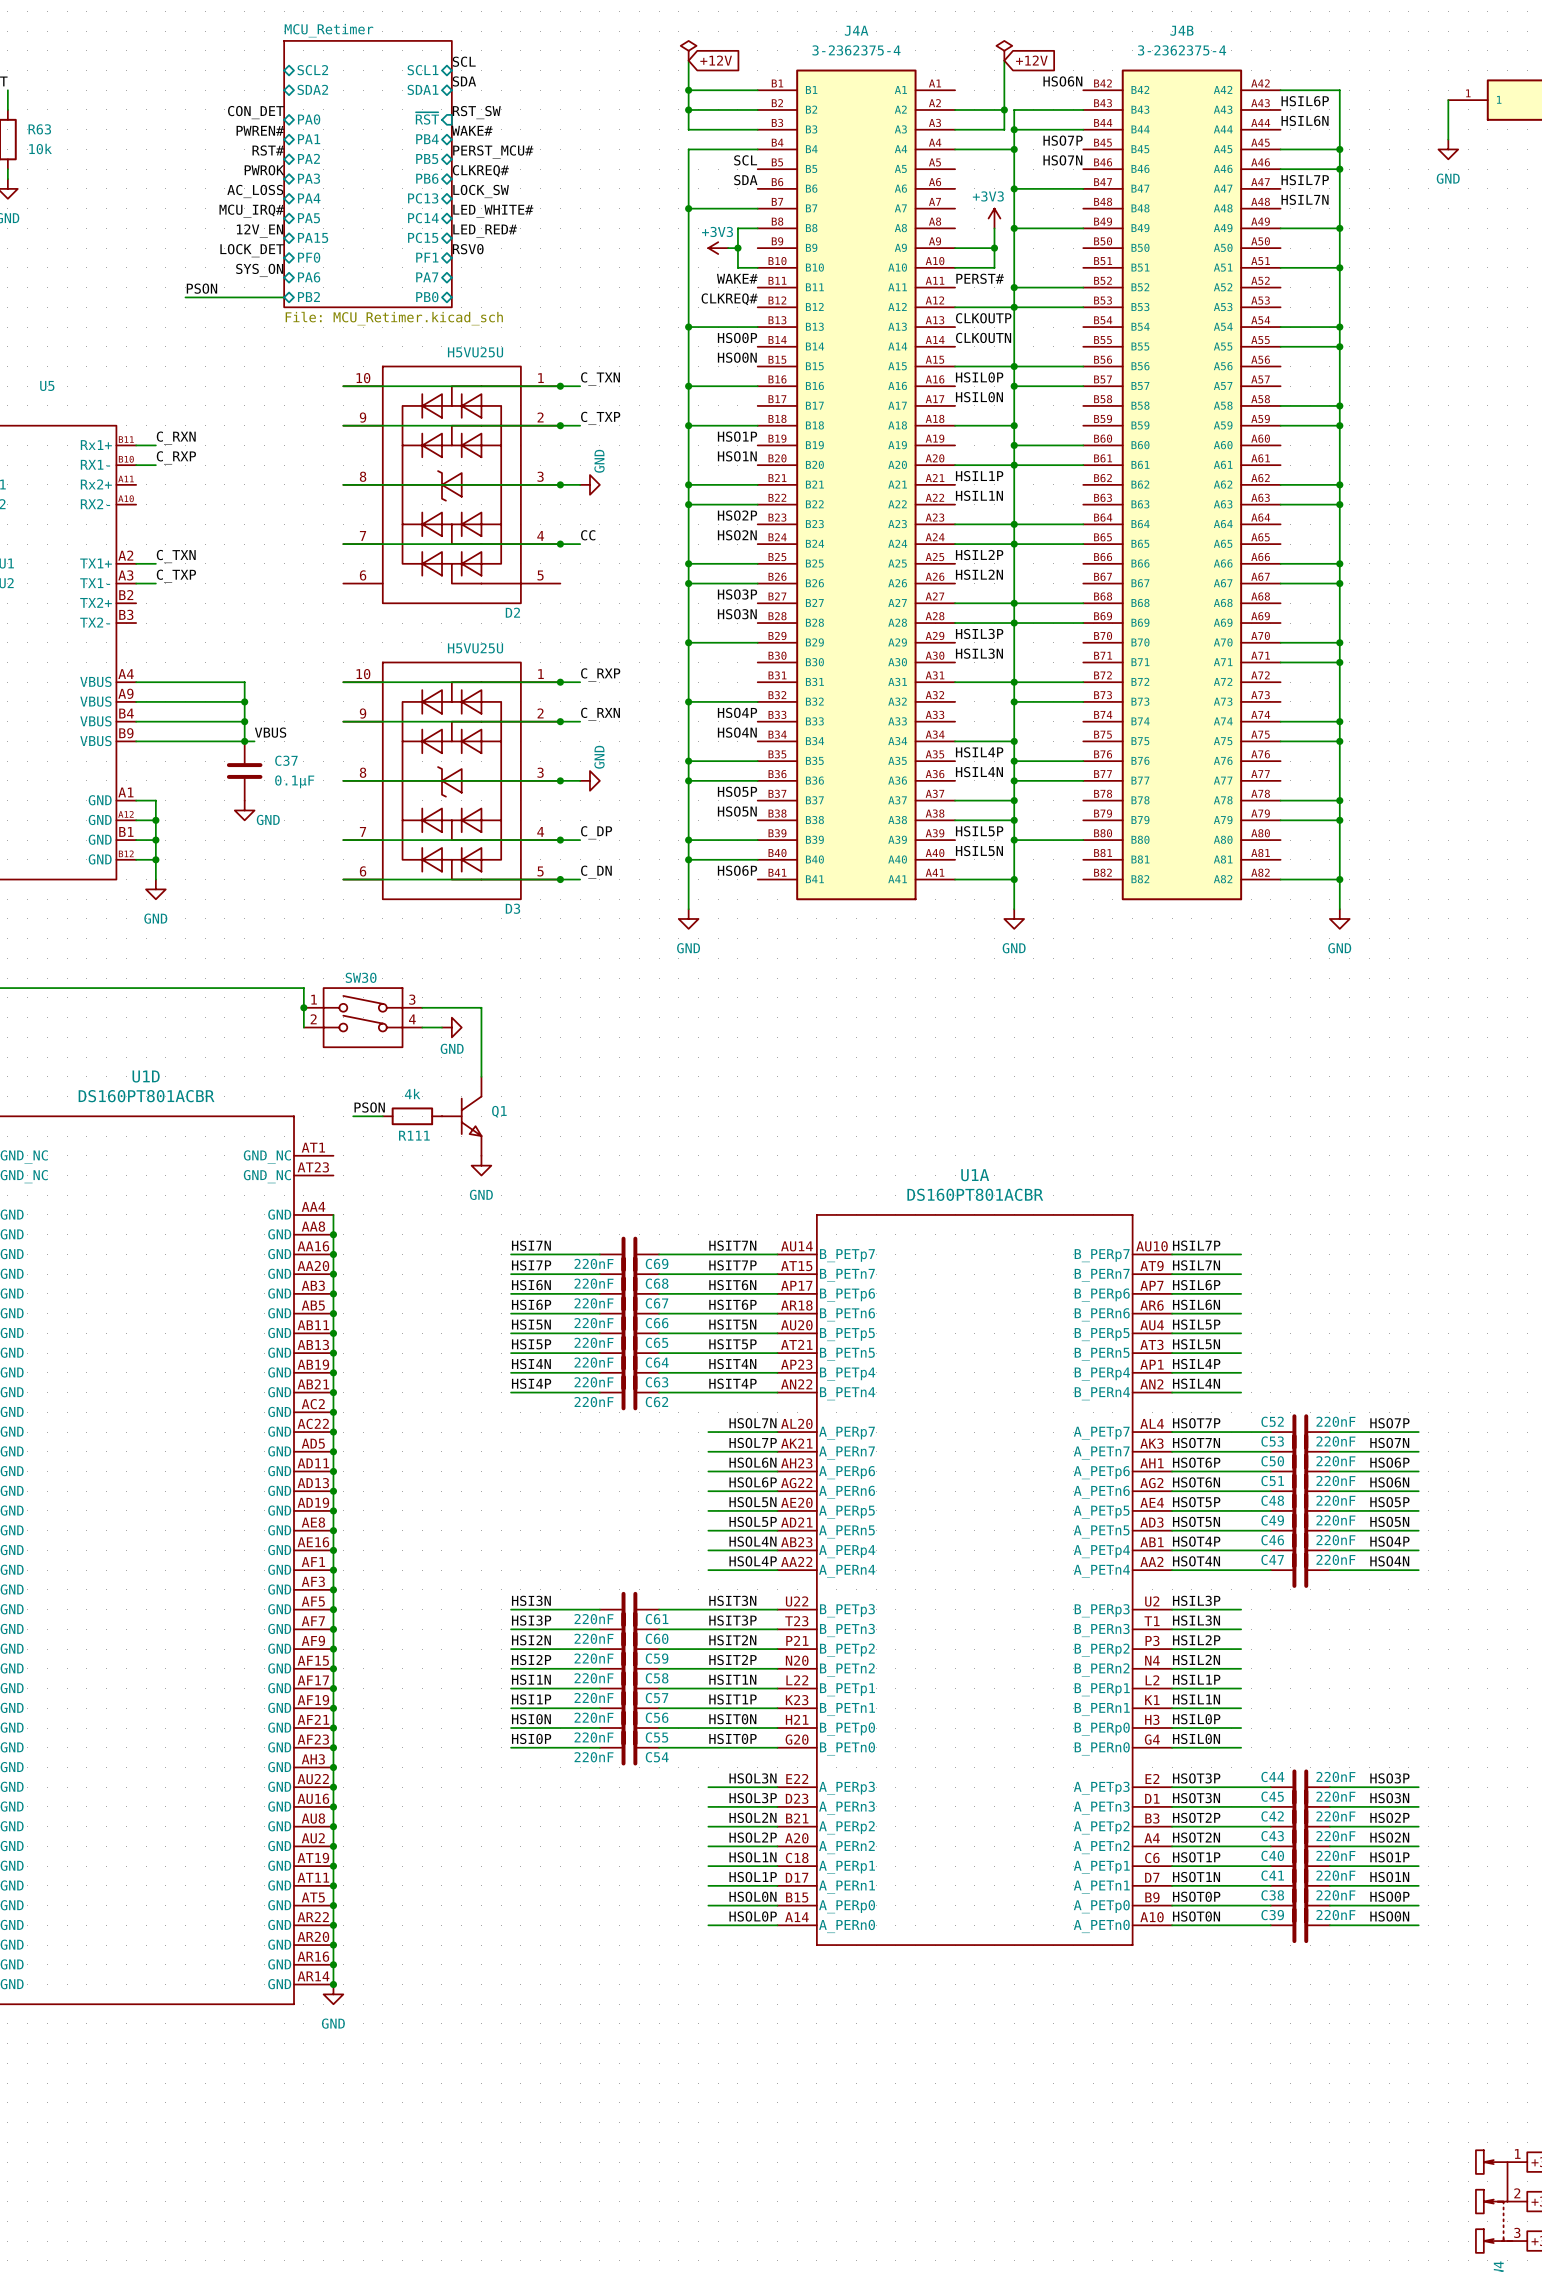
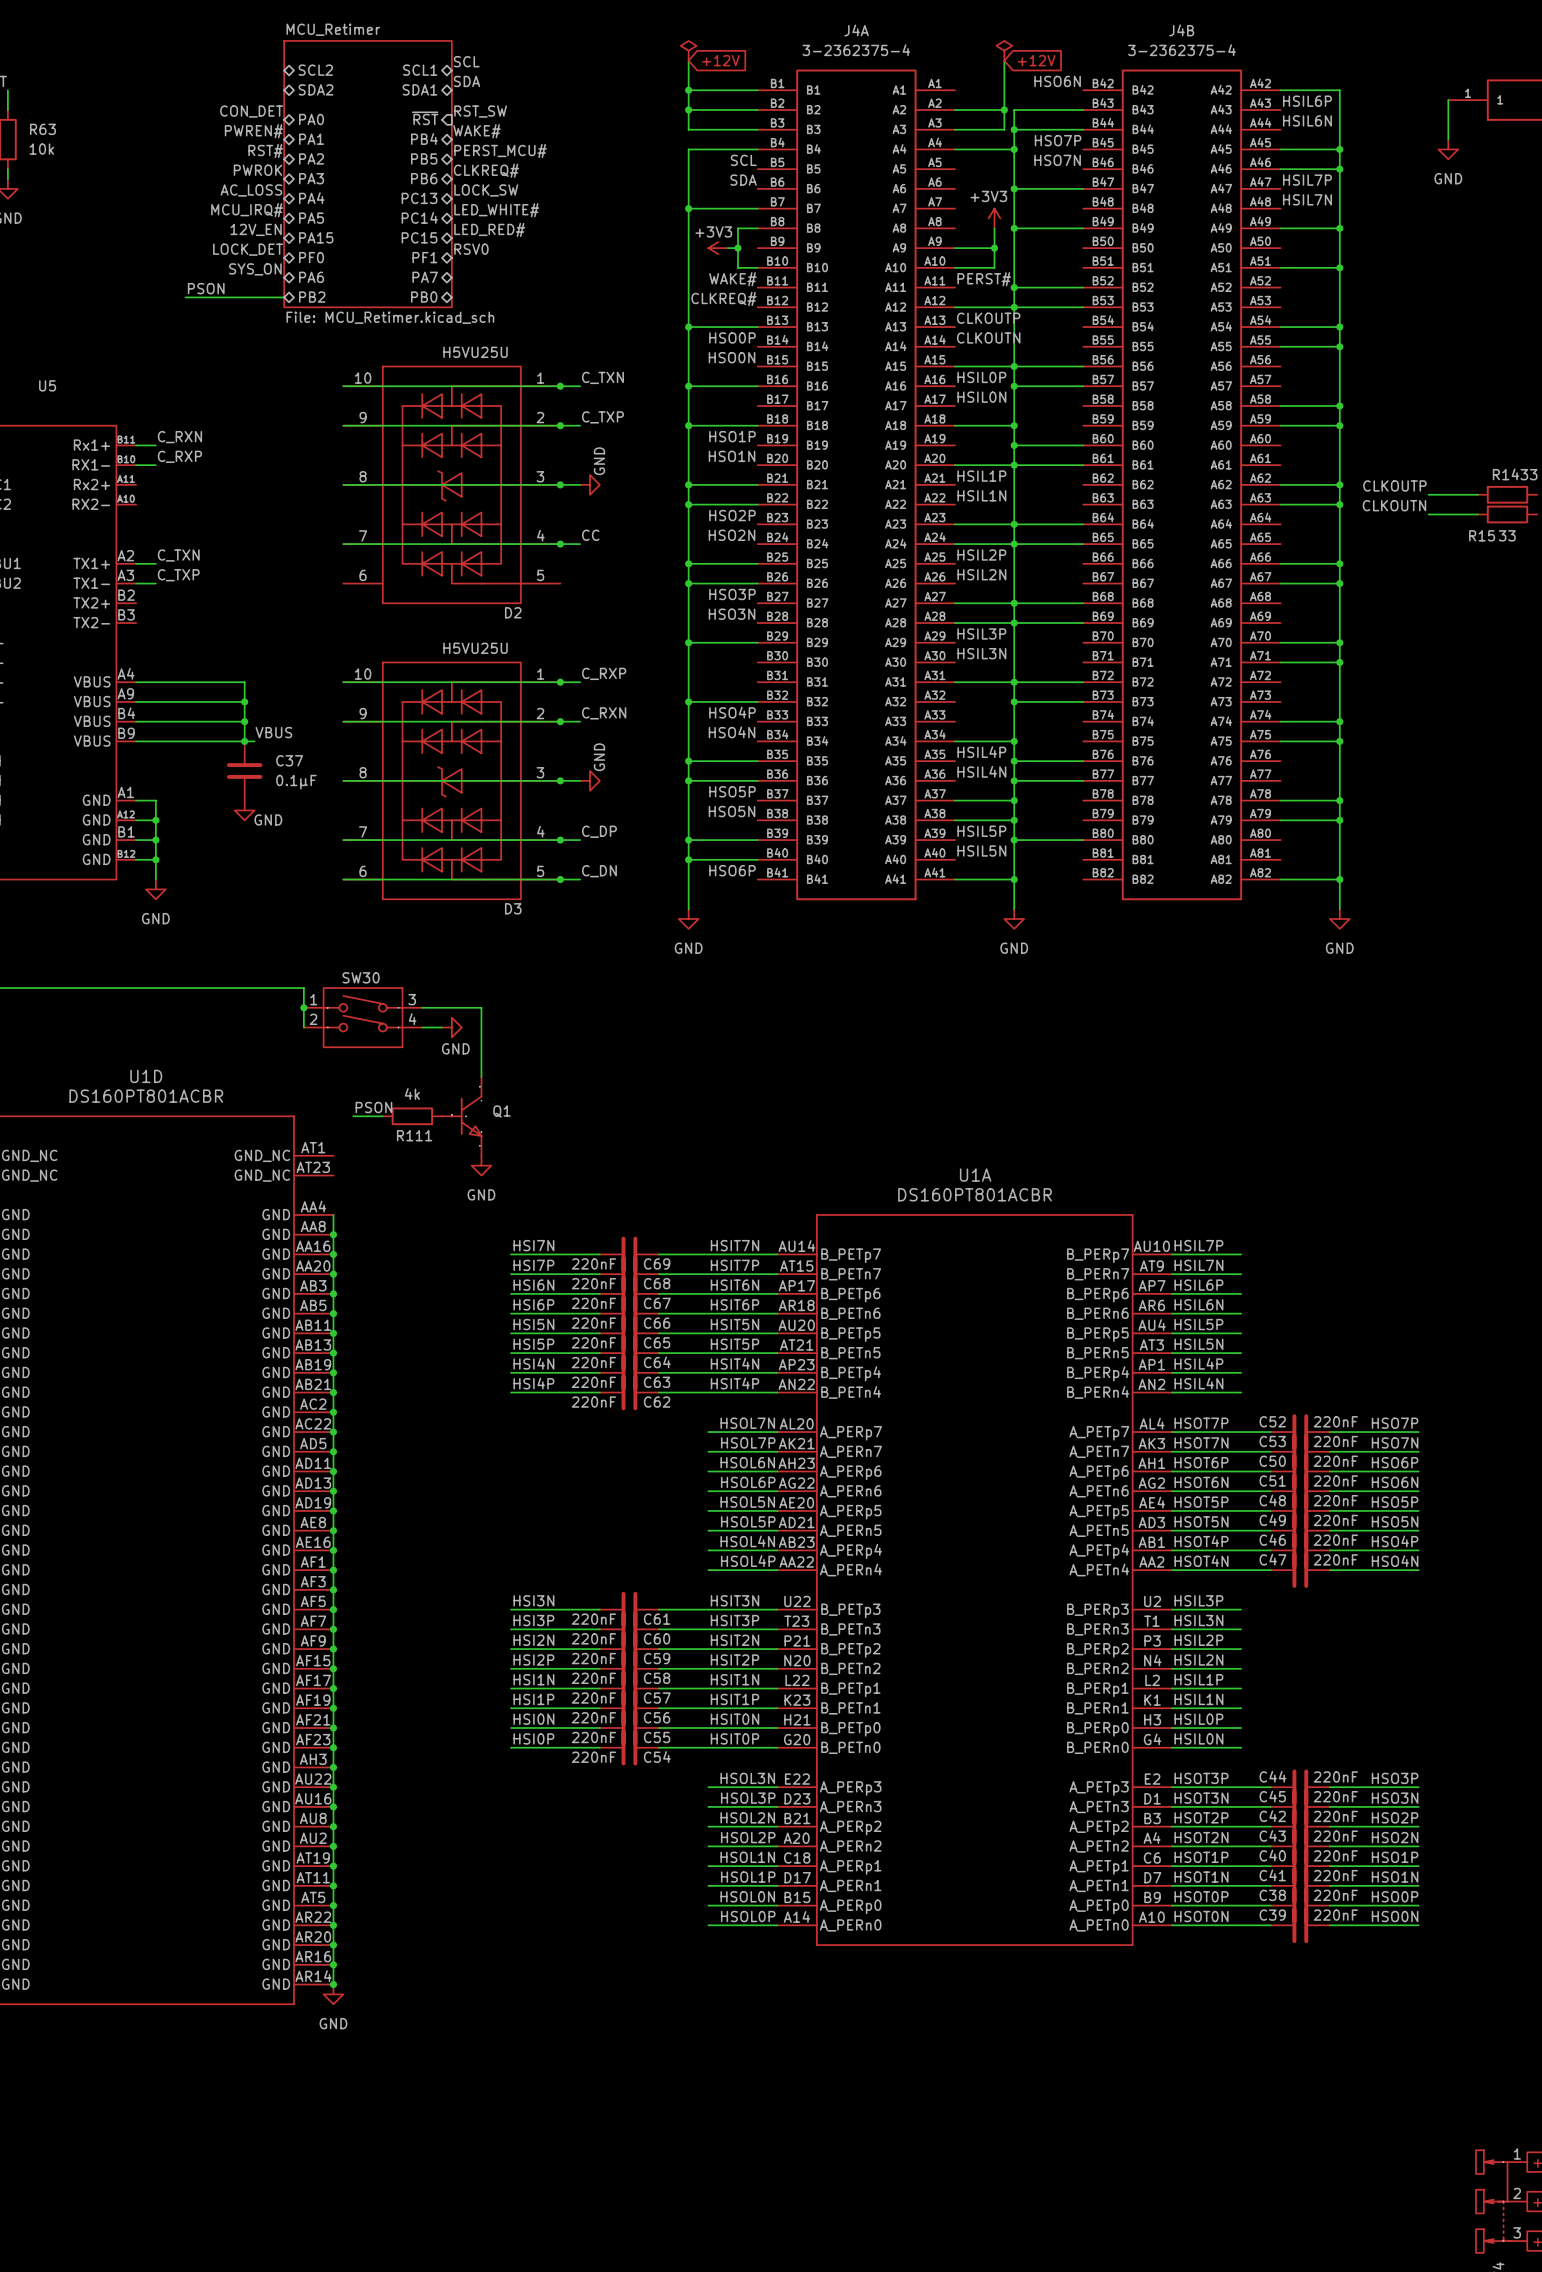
label: none -> CLKOUTP (1394, 485)
wire: none -> (1428, 494) (1477, 494)
R14: none -> 33 (1507, 494)
label: none -> CLKOUTN (1394, 505)
wire: none -> (1428, 514) (1477, 514)
R15: none -> 33 (1507, 514)

